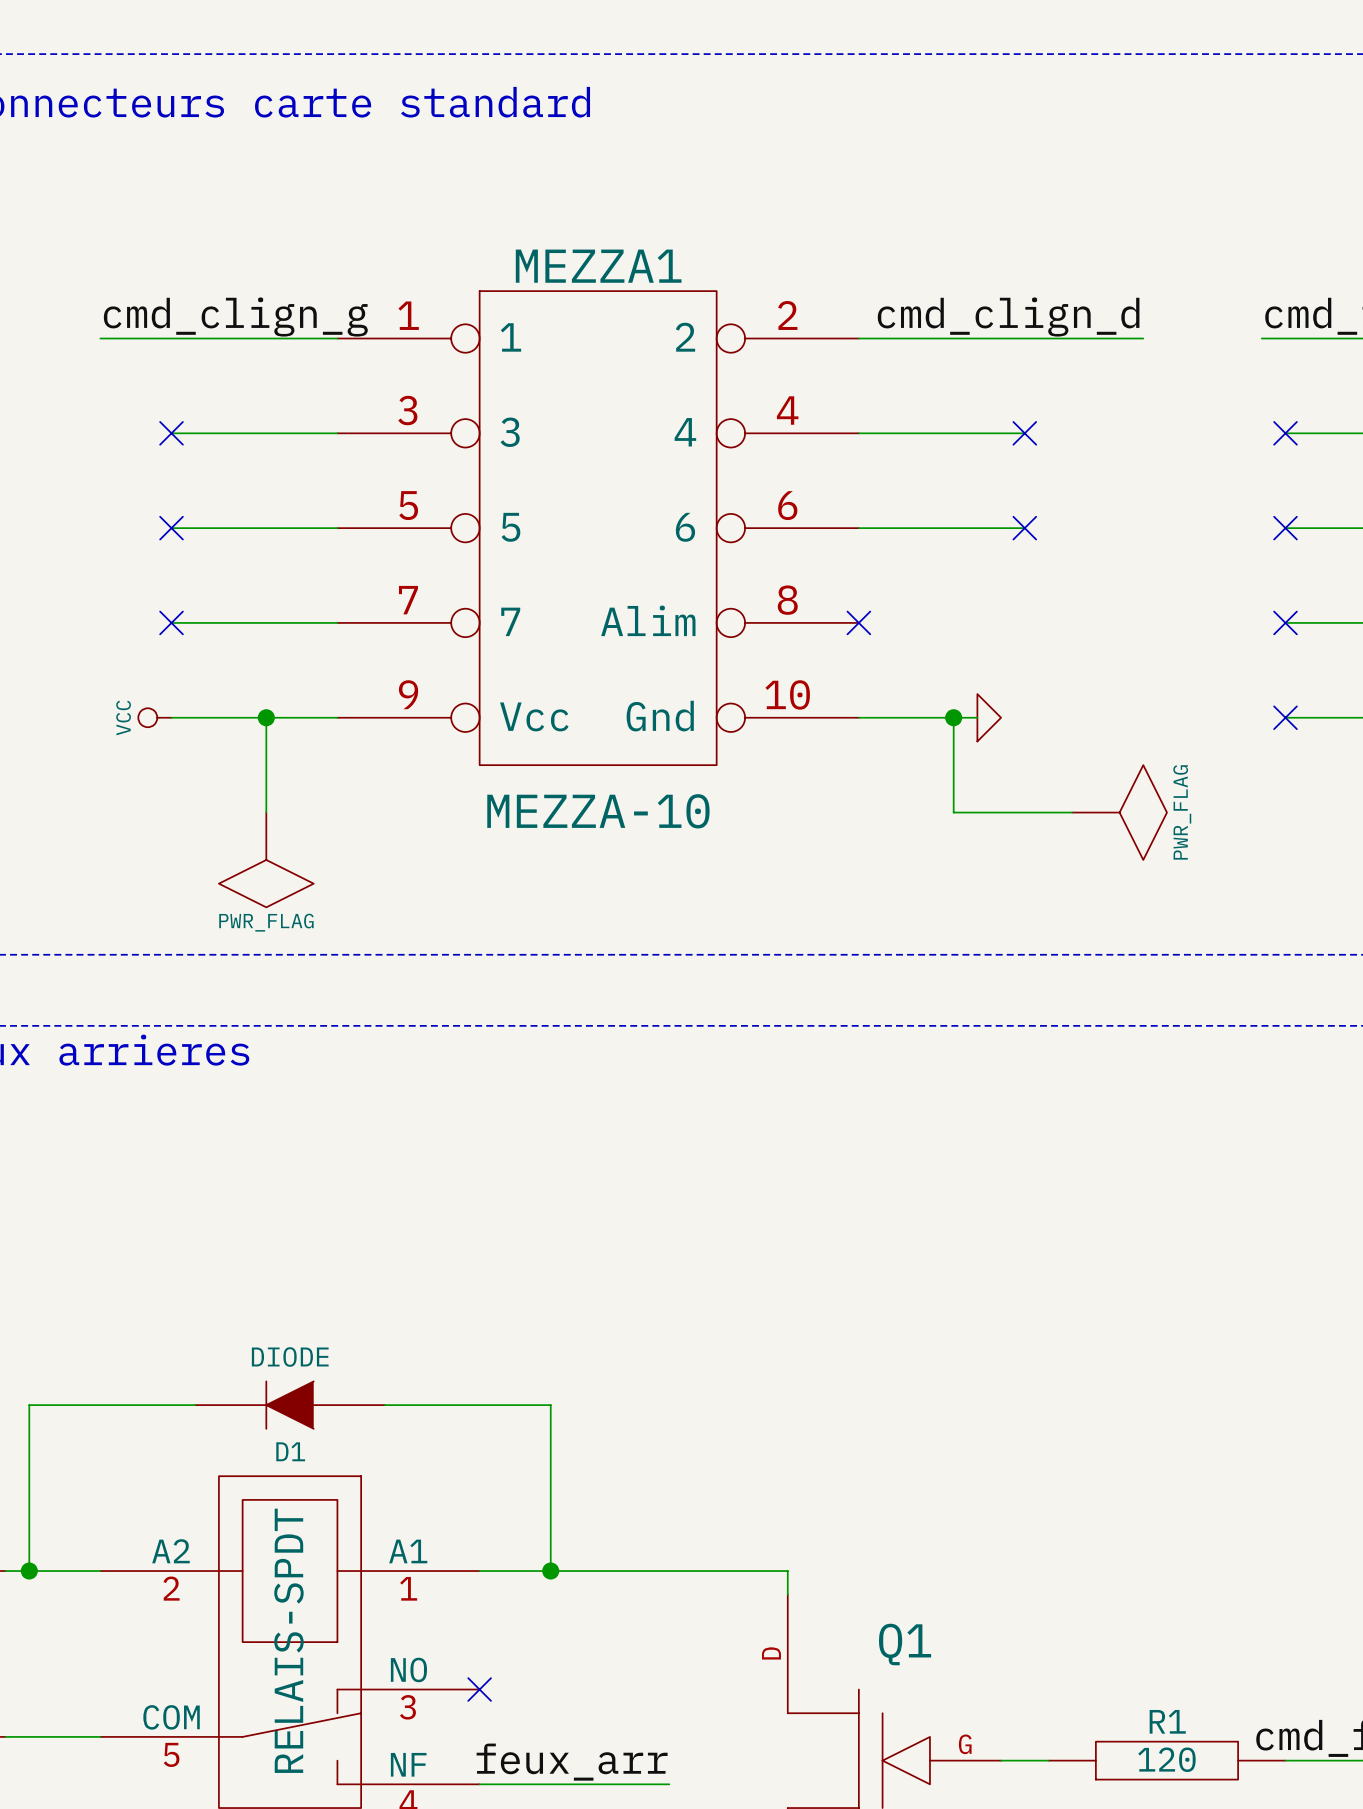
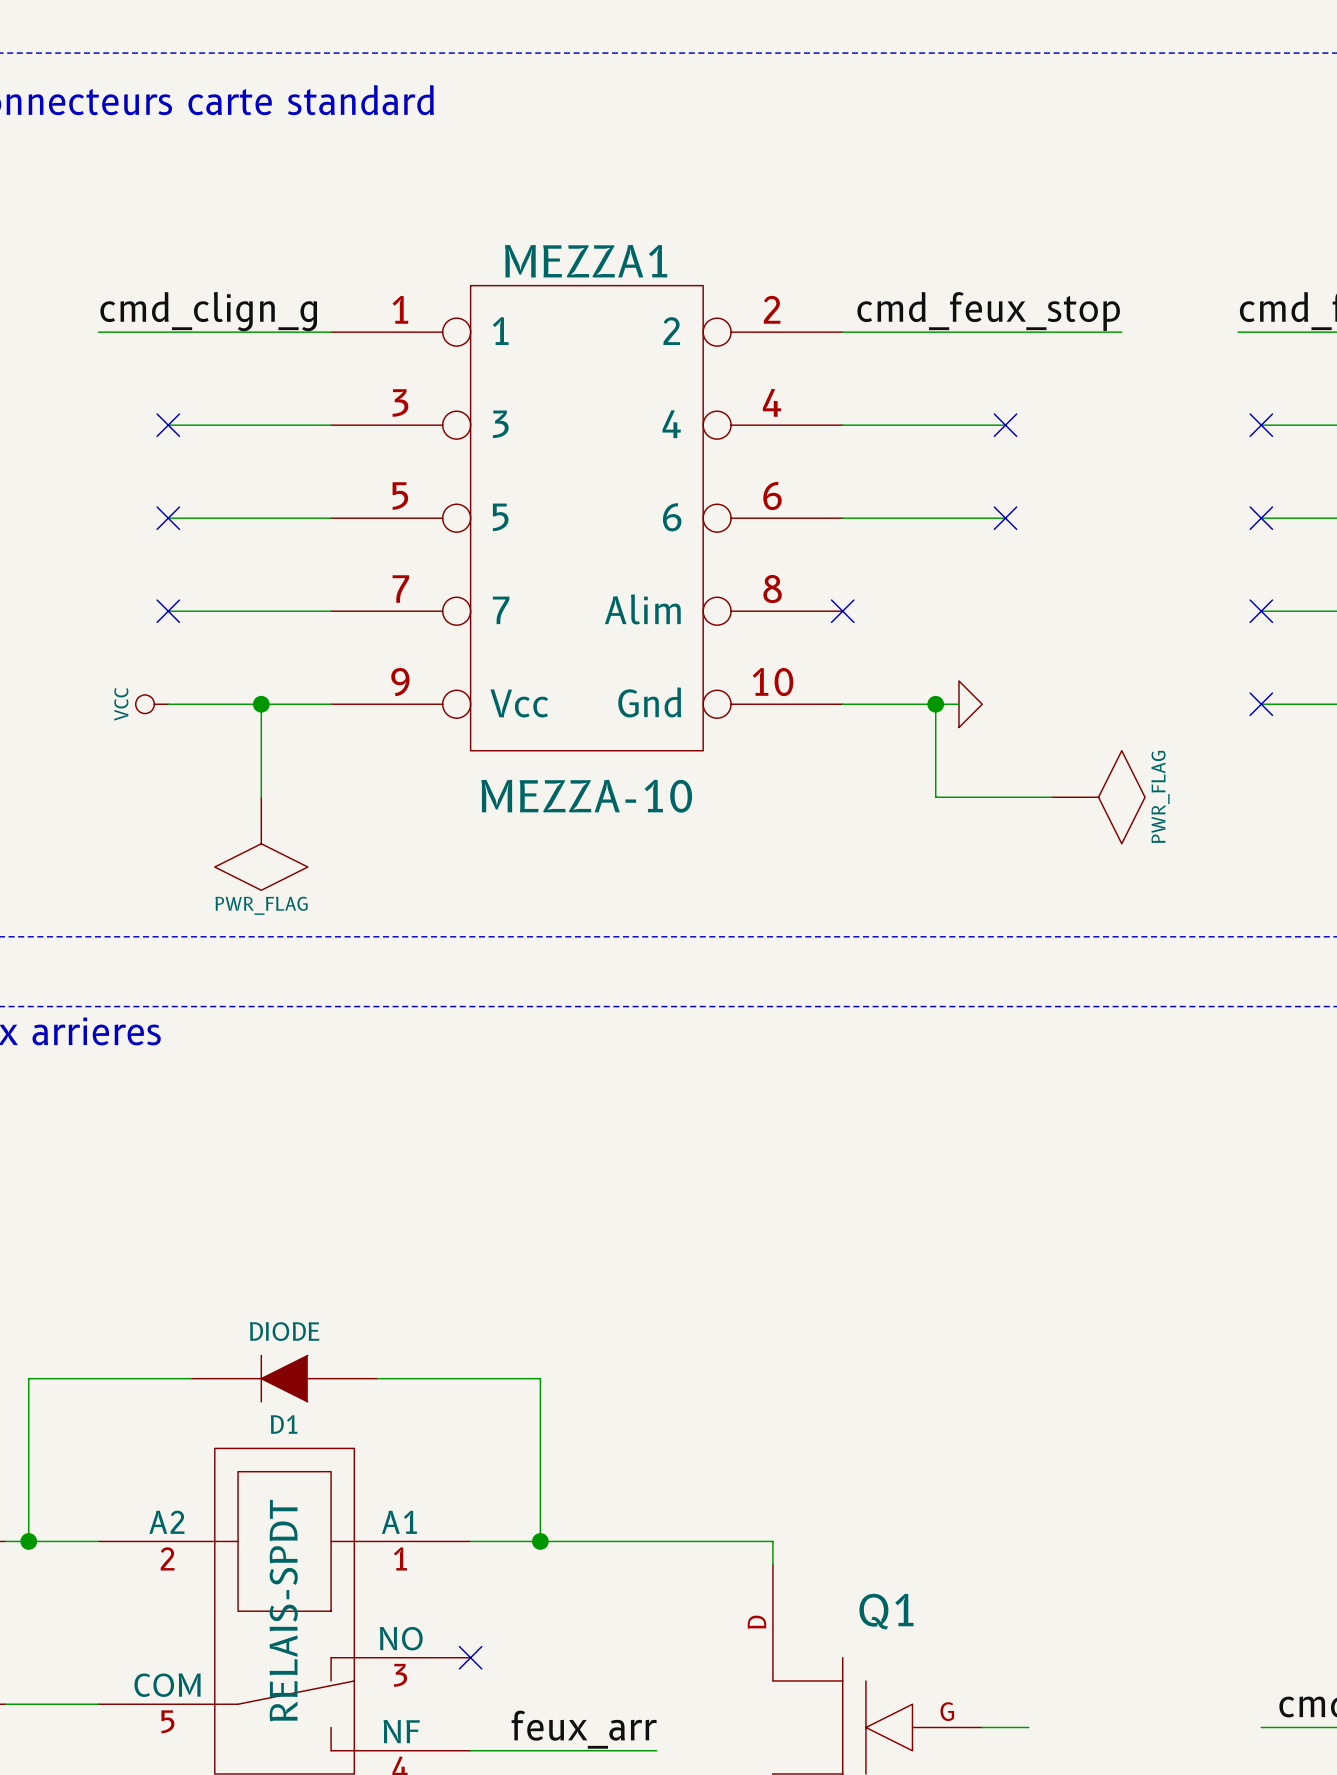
label: cmd_clign_d (1008, 317) -> cmd_feux_stop (988, 311)
R1: 120 (1166, 1760) -> none

